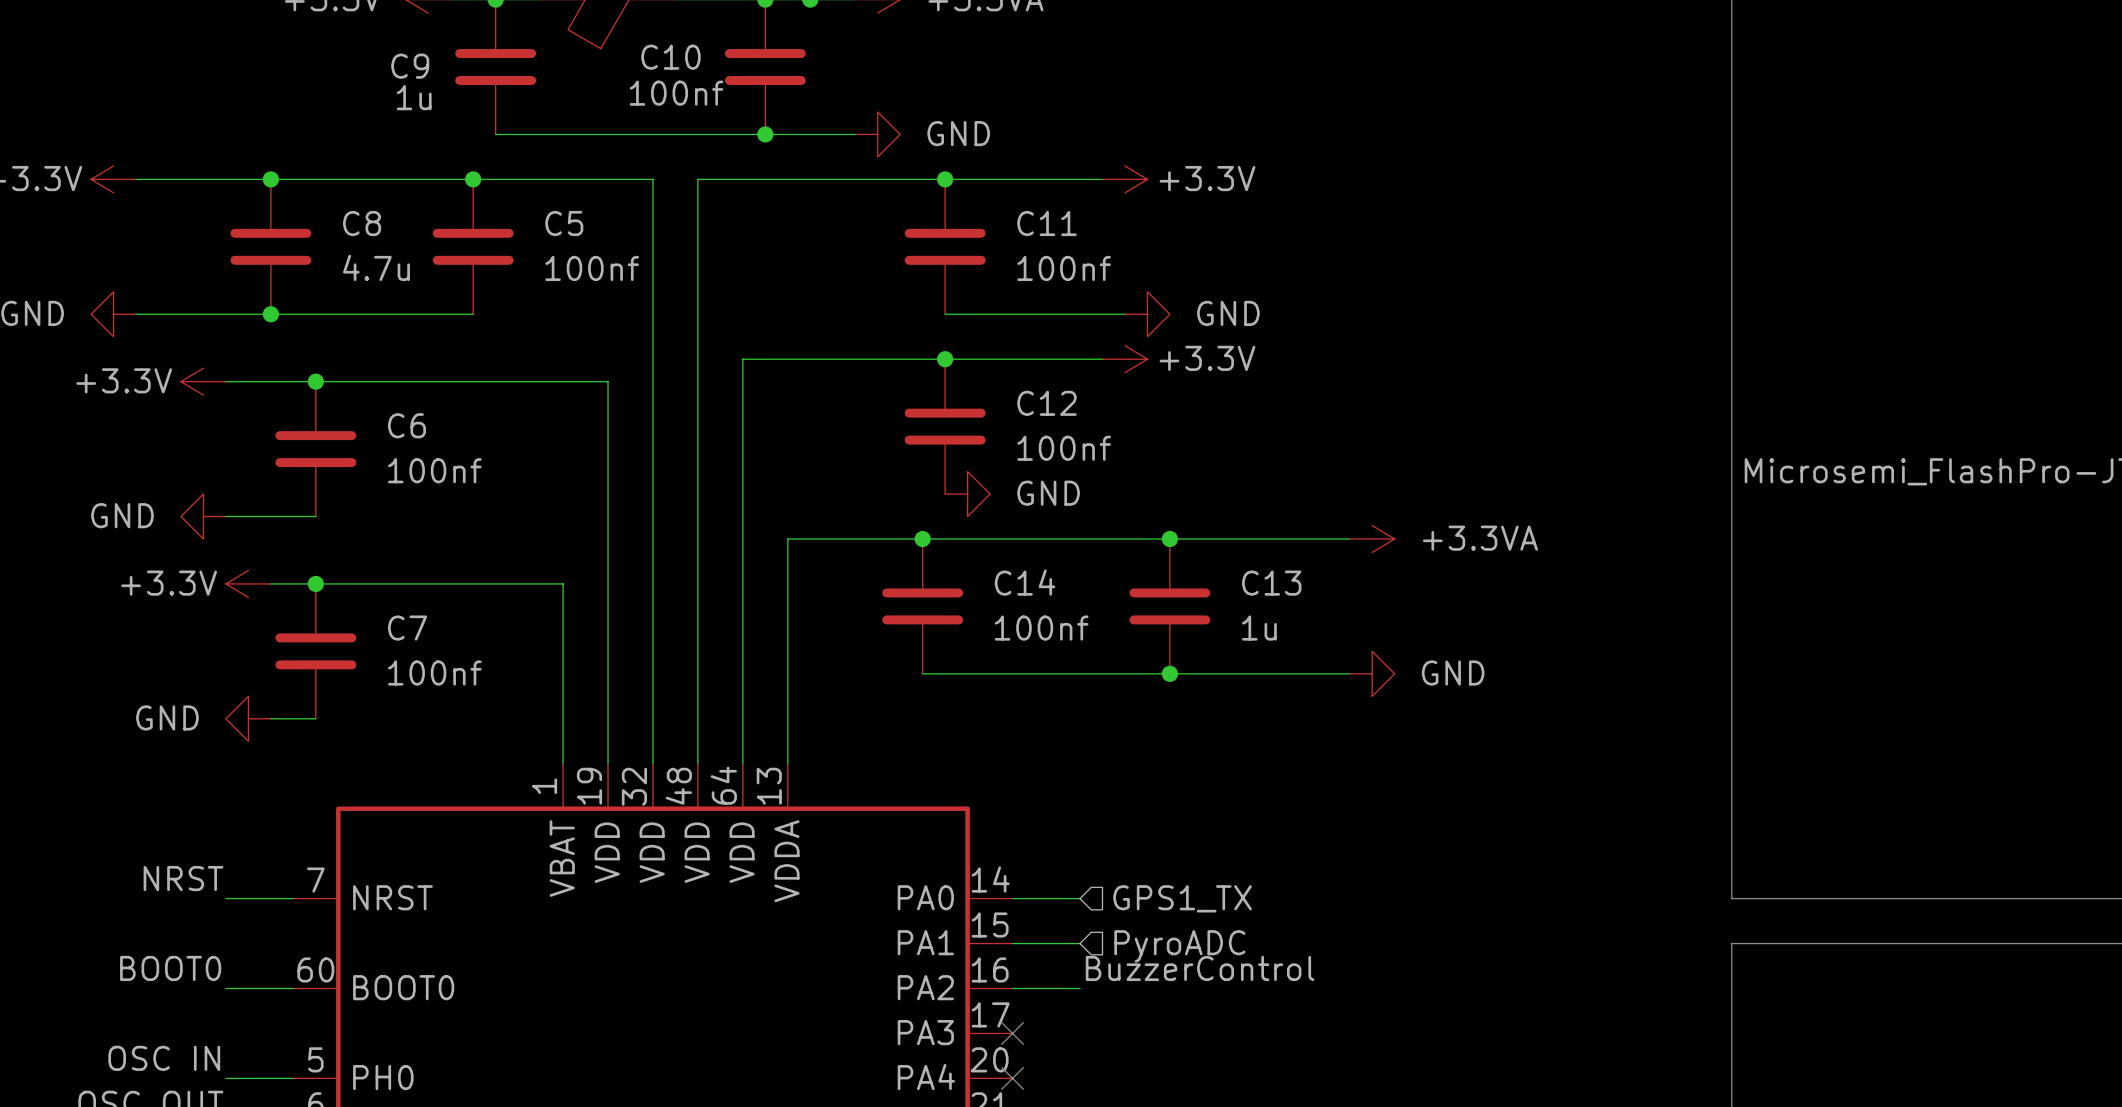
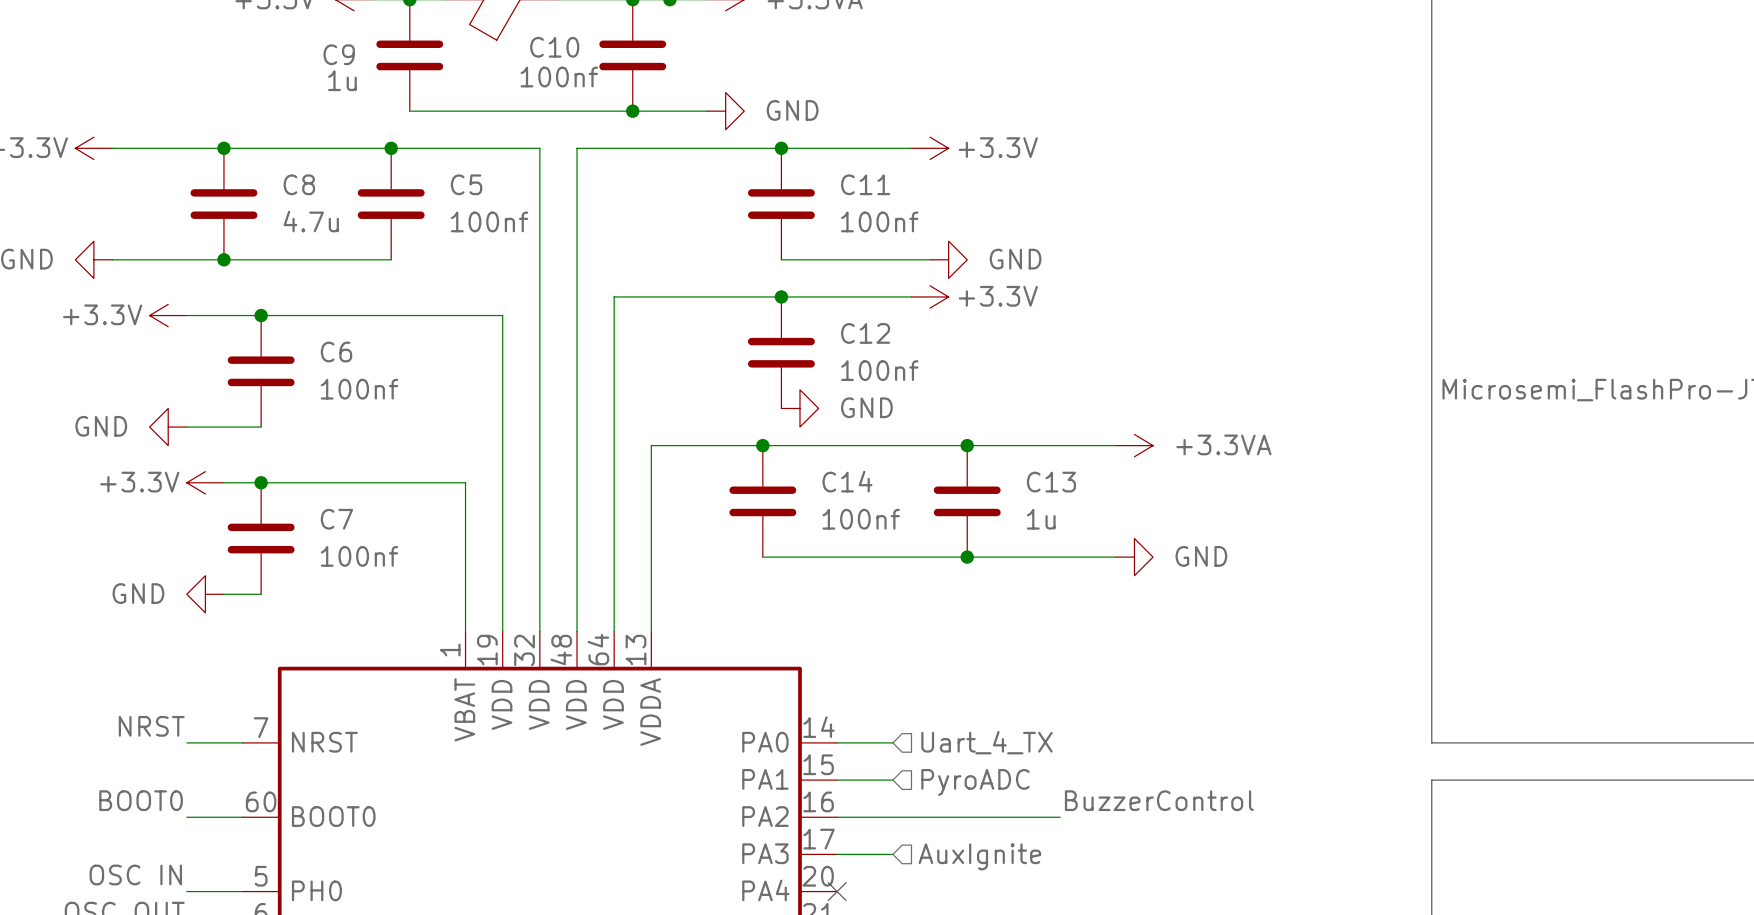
hierarchical label: GPS1_TX (1182, 898) -> Uart_4_TX (986, 742)
label position: BuzzerControl (1200, 968) -> BuzzerControl (1159, 800)
wire: none -> (892, 817) (1060, 817)
wire: none -> (837, 854) (892, 854)
no-connect mark: (1012, 1033) -> none
hierarchical label: none -> AuxIgnite (979, 856)

